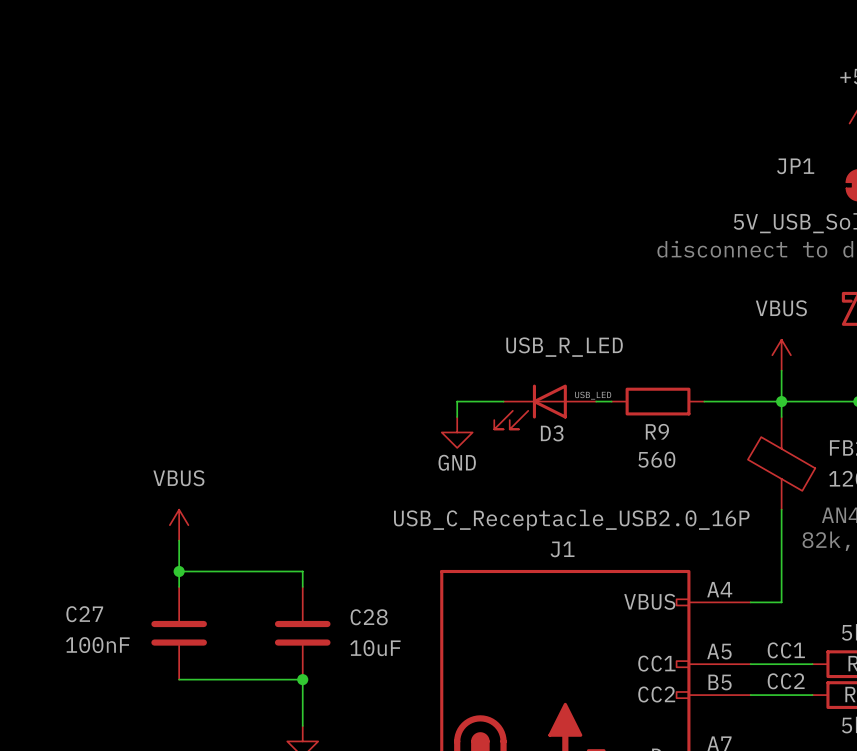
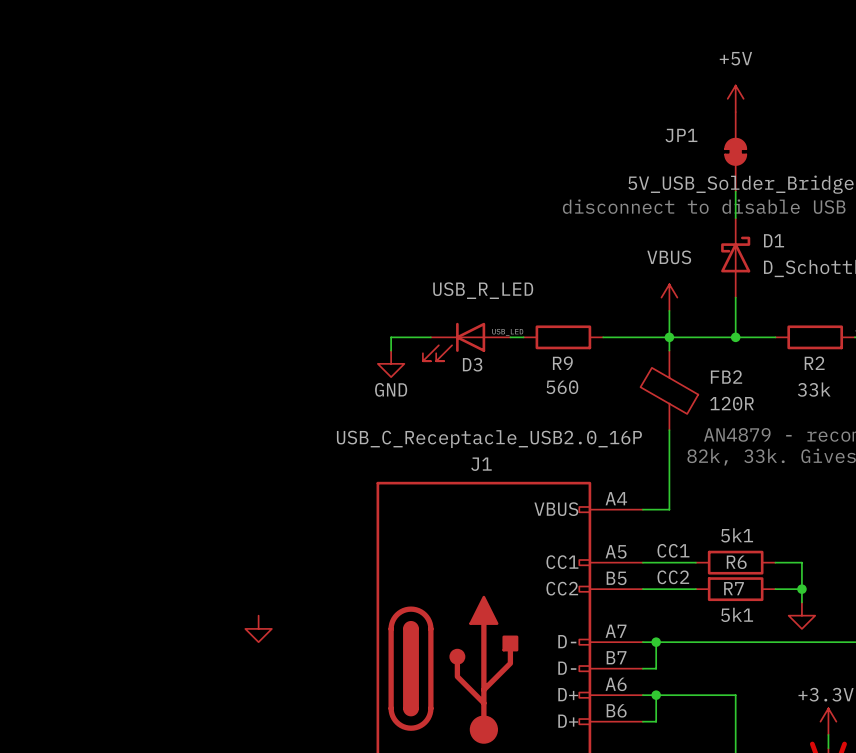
power symbol: VBUS (179, 525) -> none
wire: (179, 540) (179, 586) -> none
wire: (179, 571) (302, 571) (302, 586) -> none
junction: (179, 571) -> none
C27: 100nF (179, 633) -> none
C28: 10uF (302, 633) -> none
wire: (179, 679) (302, 679) (302, 725) -> none
junction: (302, 679) -> none

